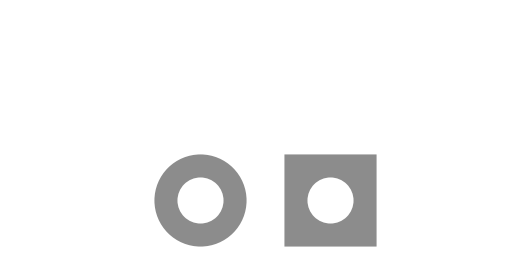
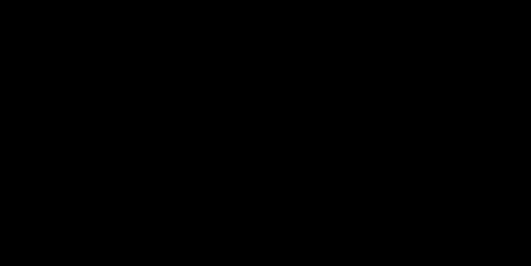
part: (265, 200) -> none

